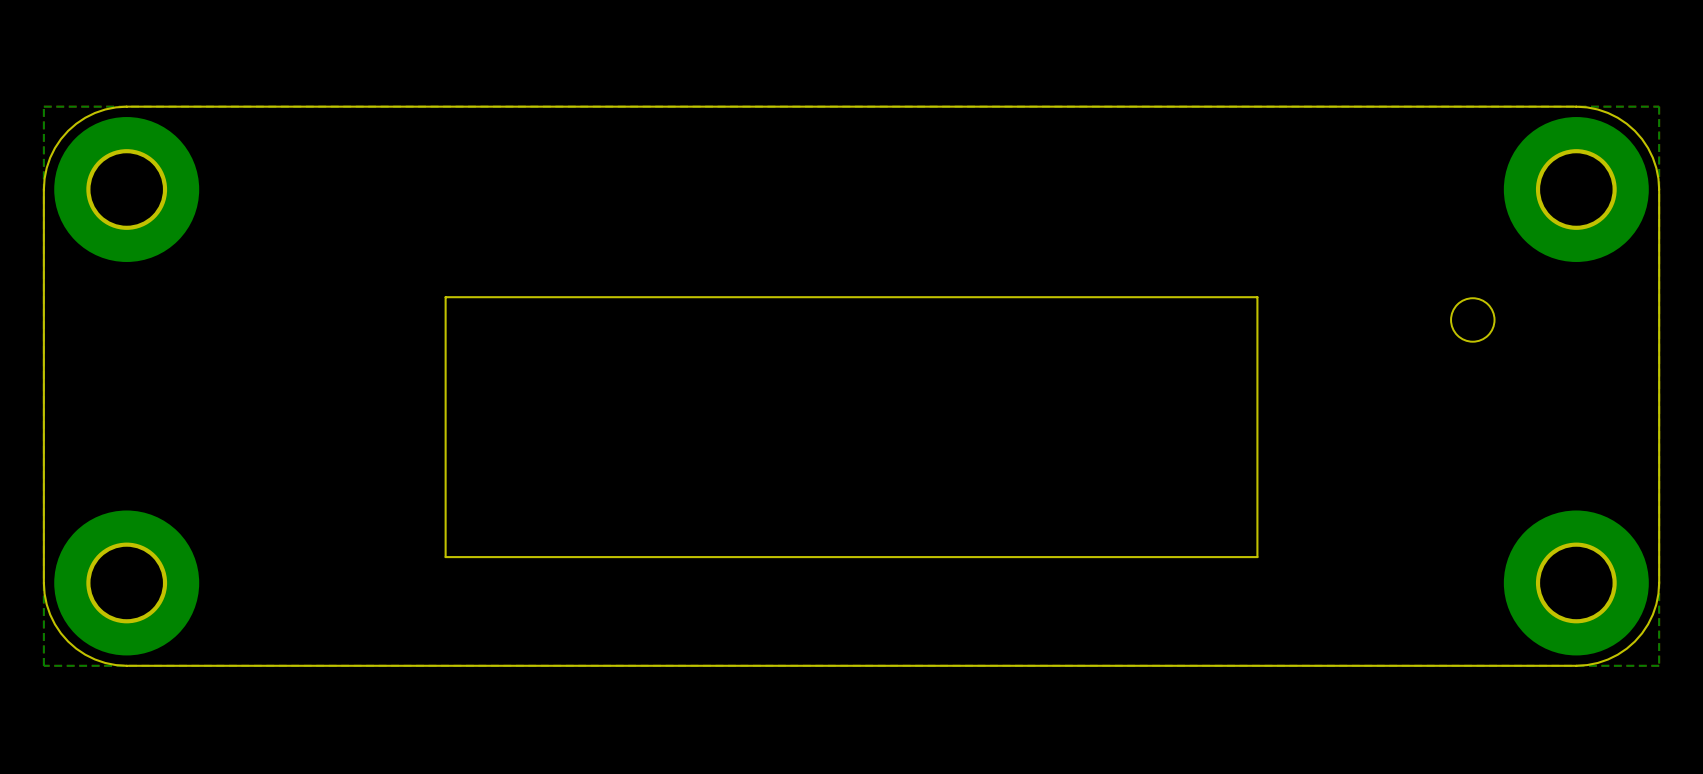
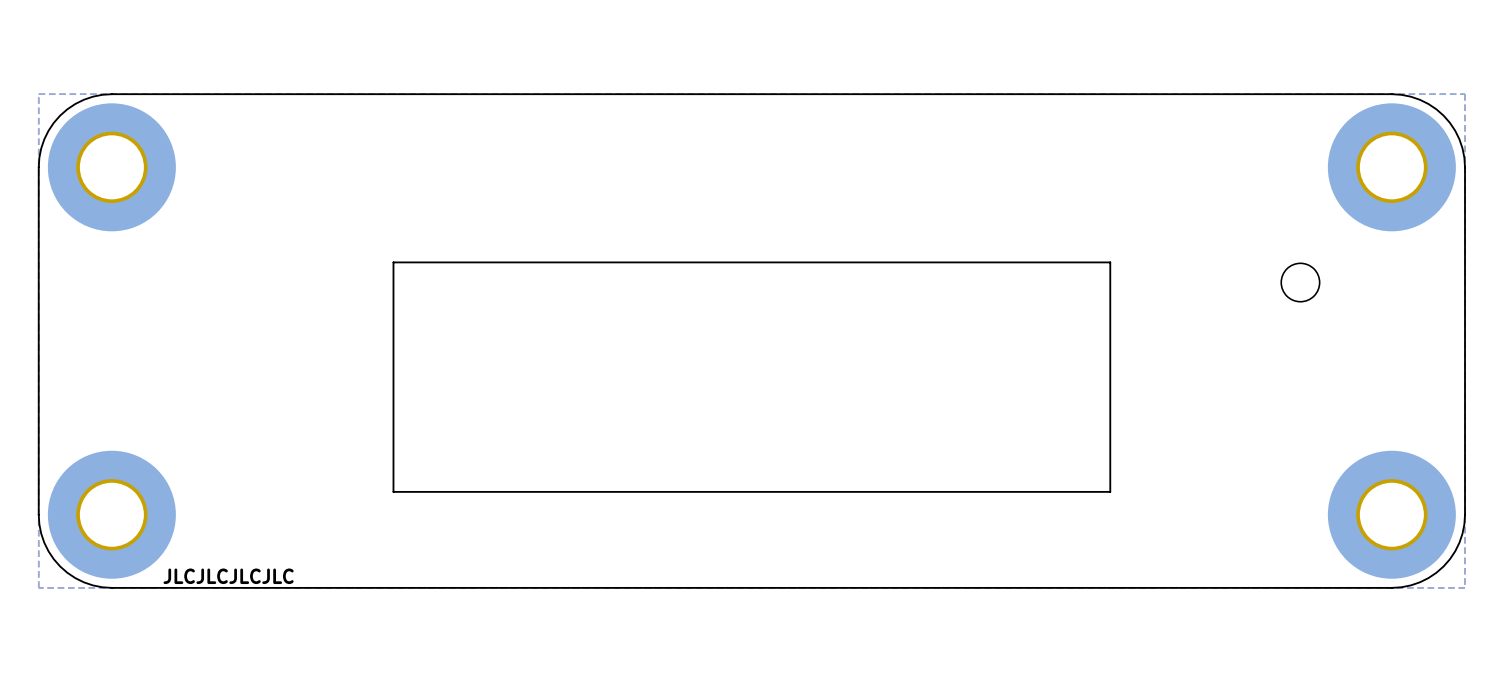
text: none -> JLCJLCJLCJLC (228, 576)

